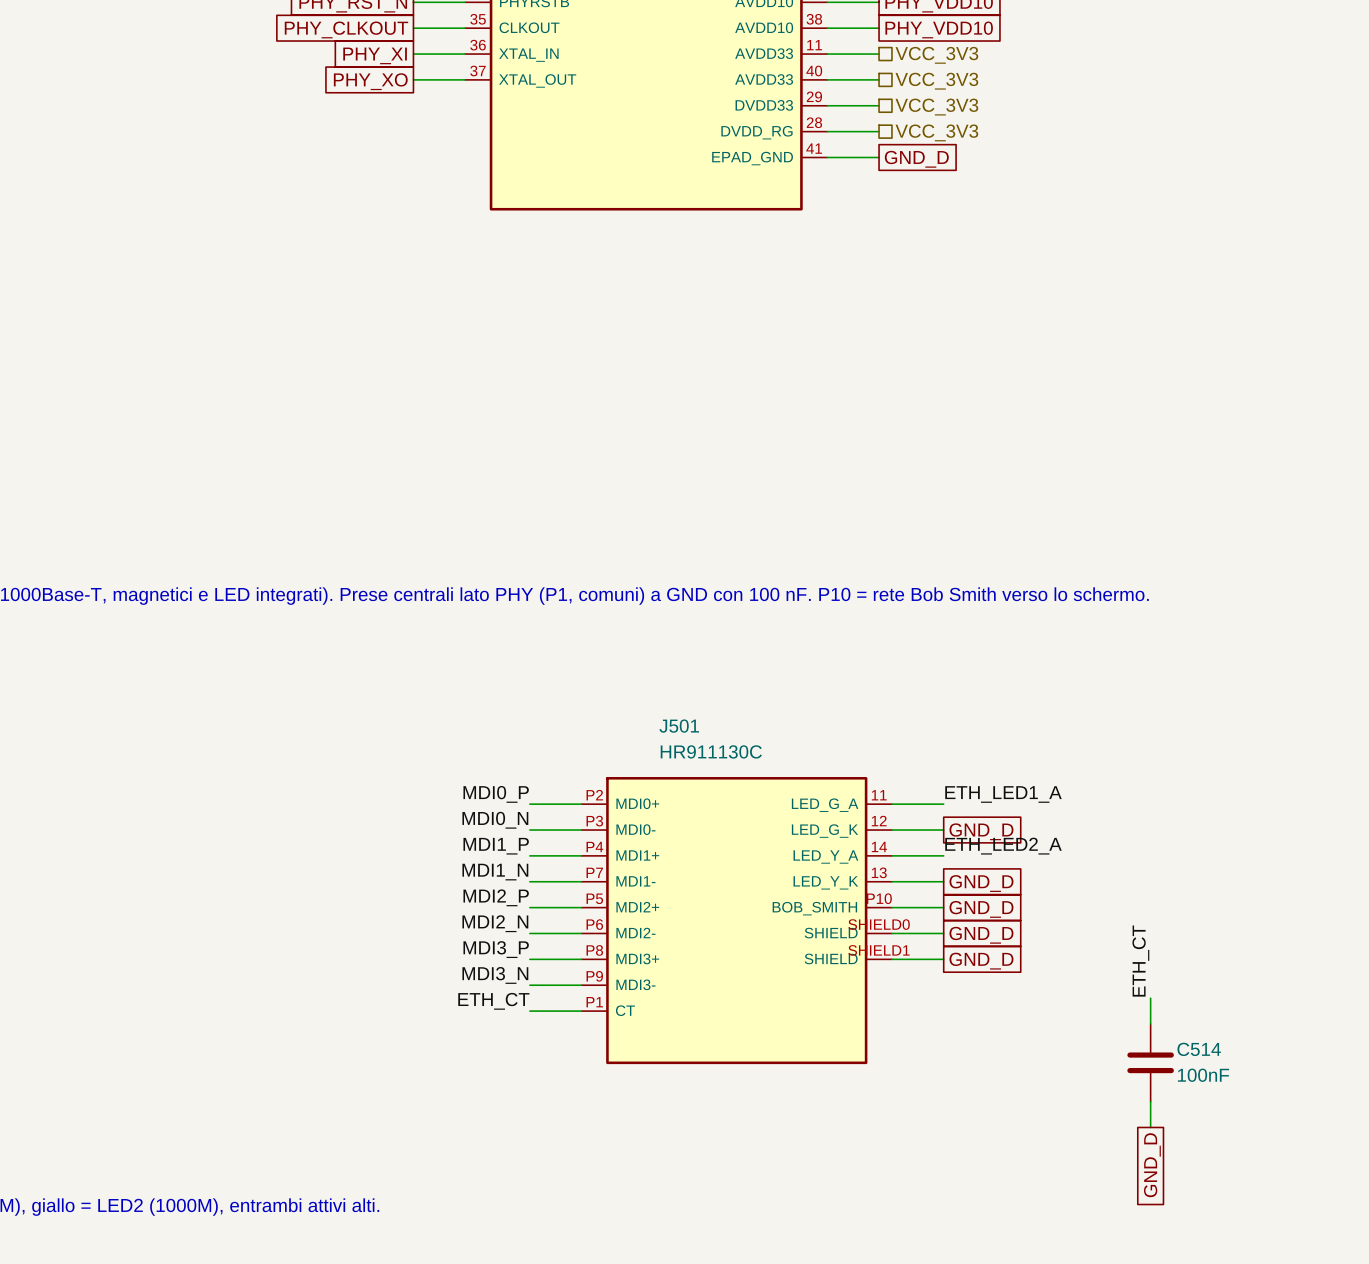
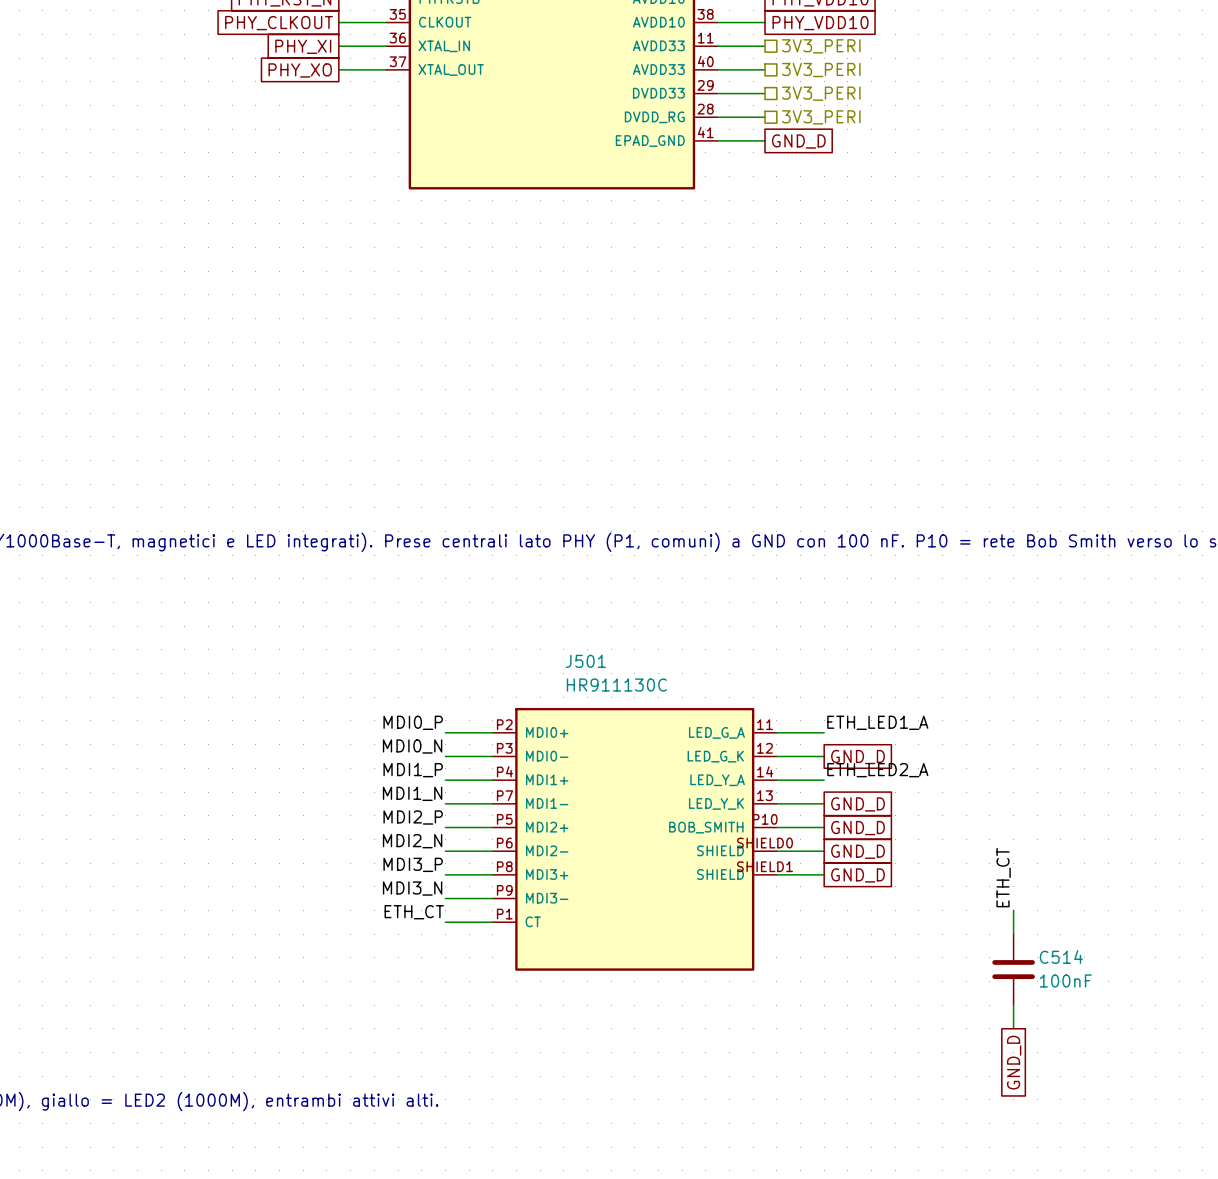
hierarchical label: VCC_3V3 (936, 55) -> 3V3_PERI (821, 46)
hierarchical label: VCC_3V3 (936, 81) -> 3V3_PERI (821, 70)
hierarchical label: VCC_3V3 (936, 107) -> 3V3_PERI (821, 93)
hierarchical label: VCC_3V3 (936, 132) -> 3V3_PERI (821, 117)

